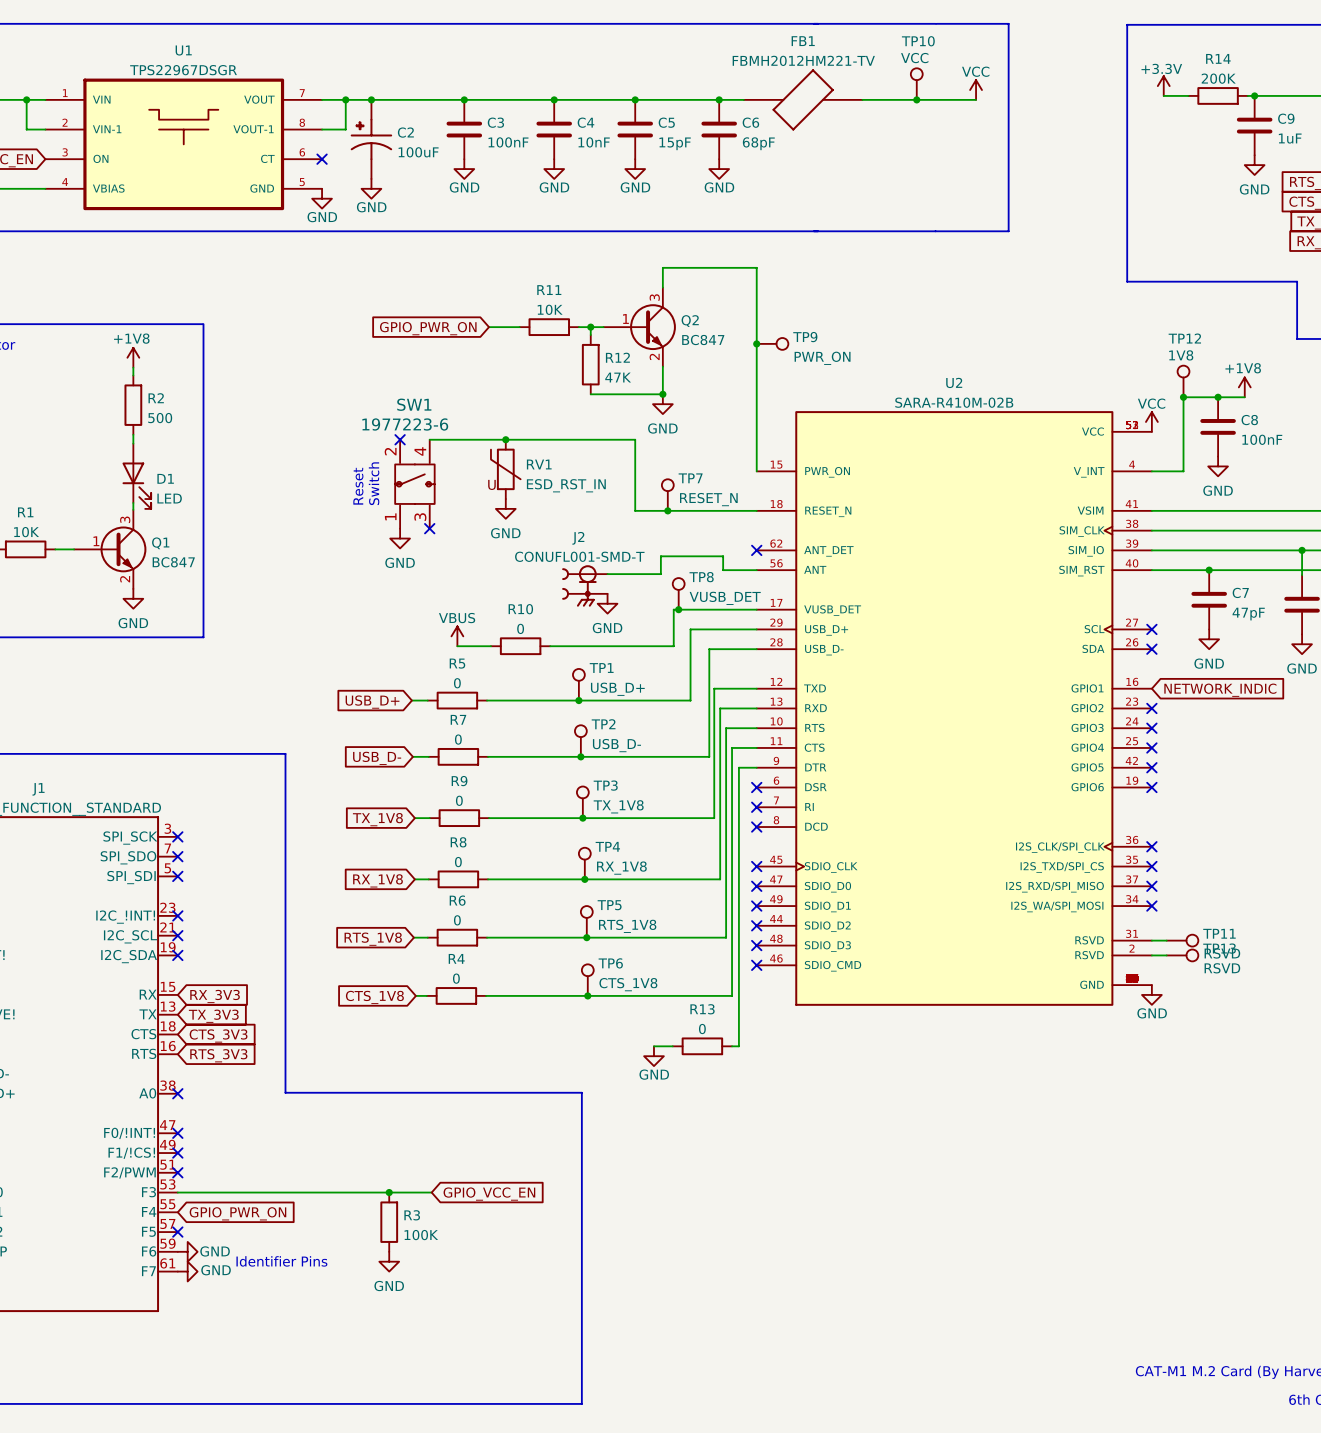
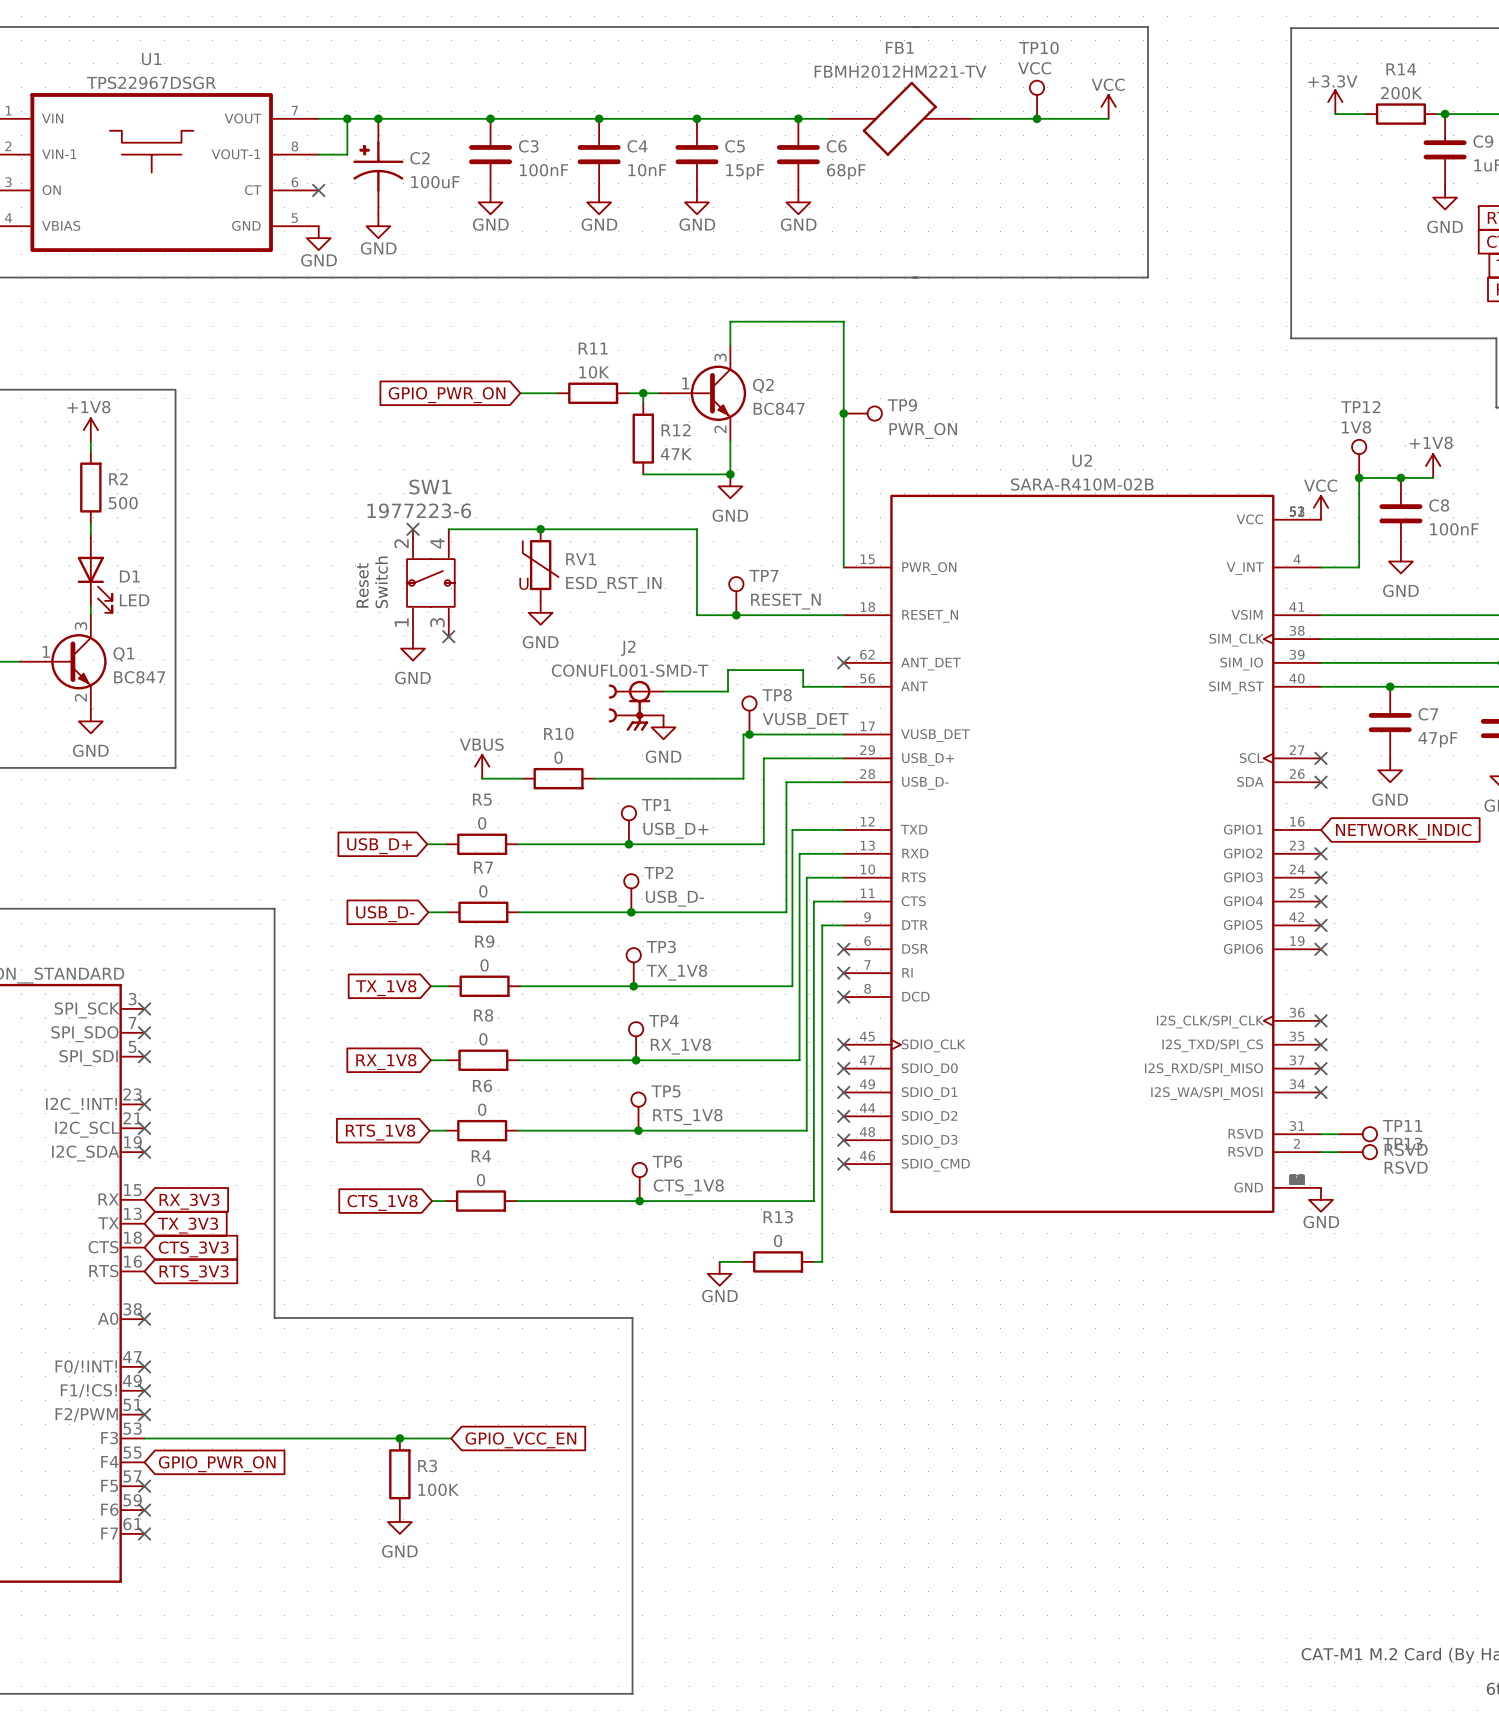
no-connect mark: none -> (144, 1510)
power symbol: GND (187, 1251) -> none
text: Identifier Pins (281, 1261) -> none
no-connect mark: none -> (144, 1533)
power symbol: GND (187, 1271) -> none

